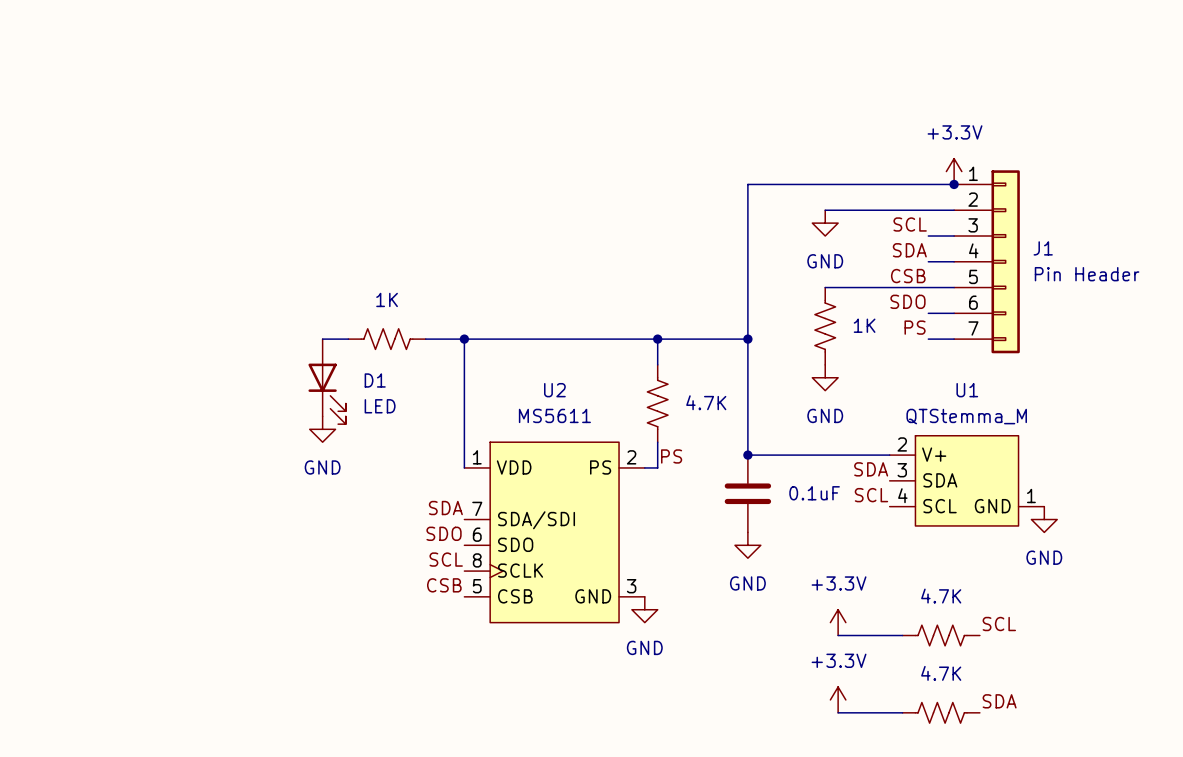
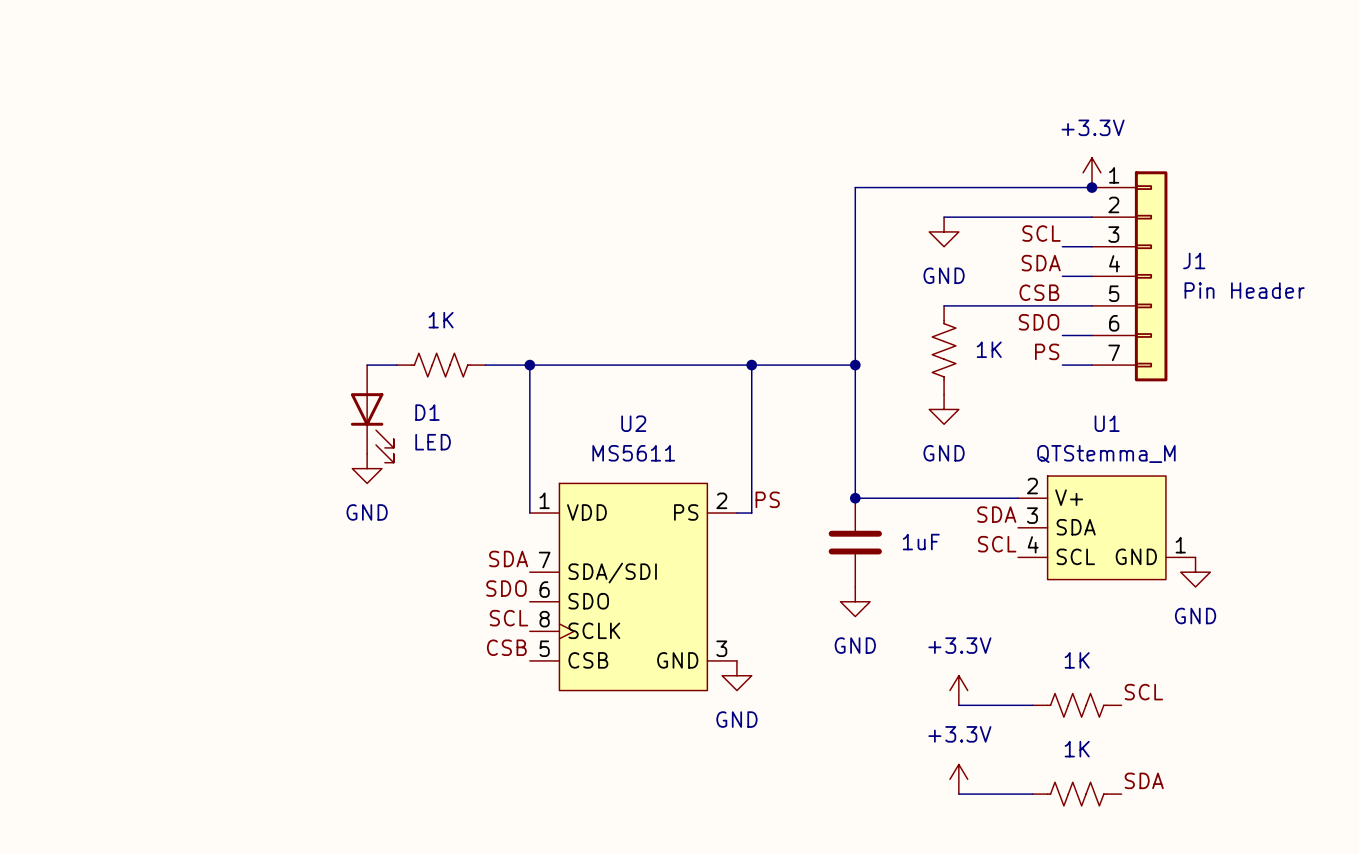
part: 4.7K (657, 403) -> none
part value: 0.1uF (814, 493) -> 1uF (921, 542)
part value: 4.7K (941, 596) -> 1K (1077, 660)
part value: 4.7K (941, 673) -> 1K (1077, 749)

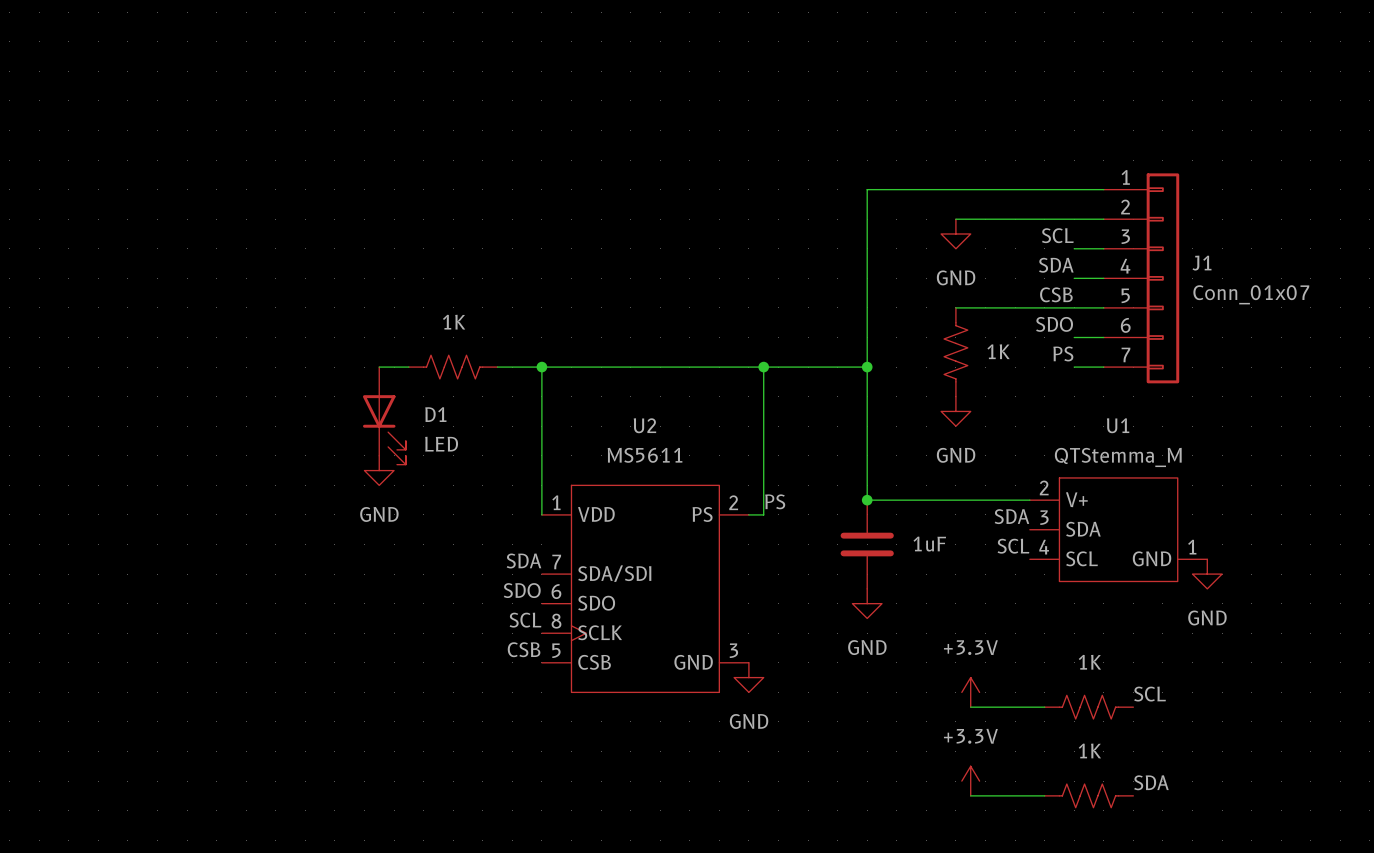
power symbol: +3.3V (1091, 172) -> none
junction: (1091, 187) -> none
J1 value: Pin Header (1244, 290) -> Conn_01x07 (1251, 294)

